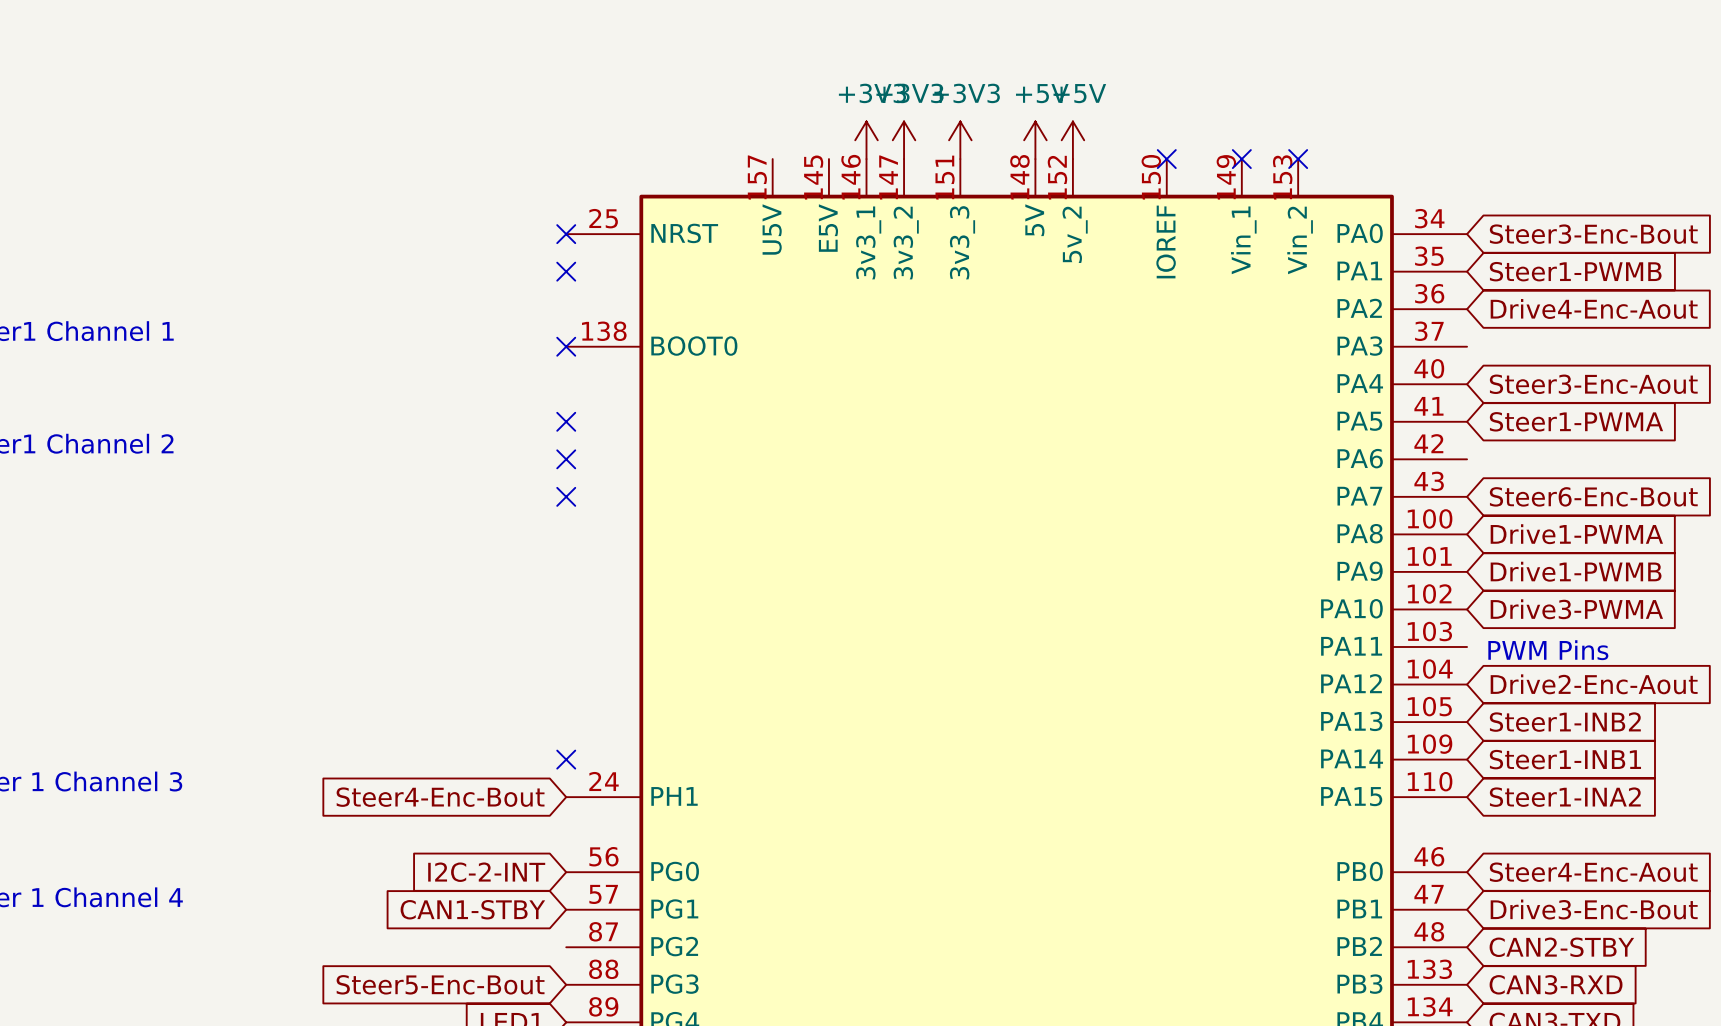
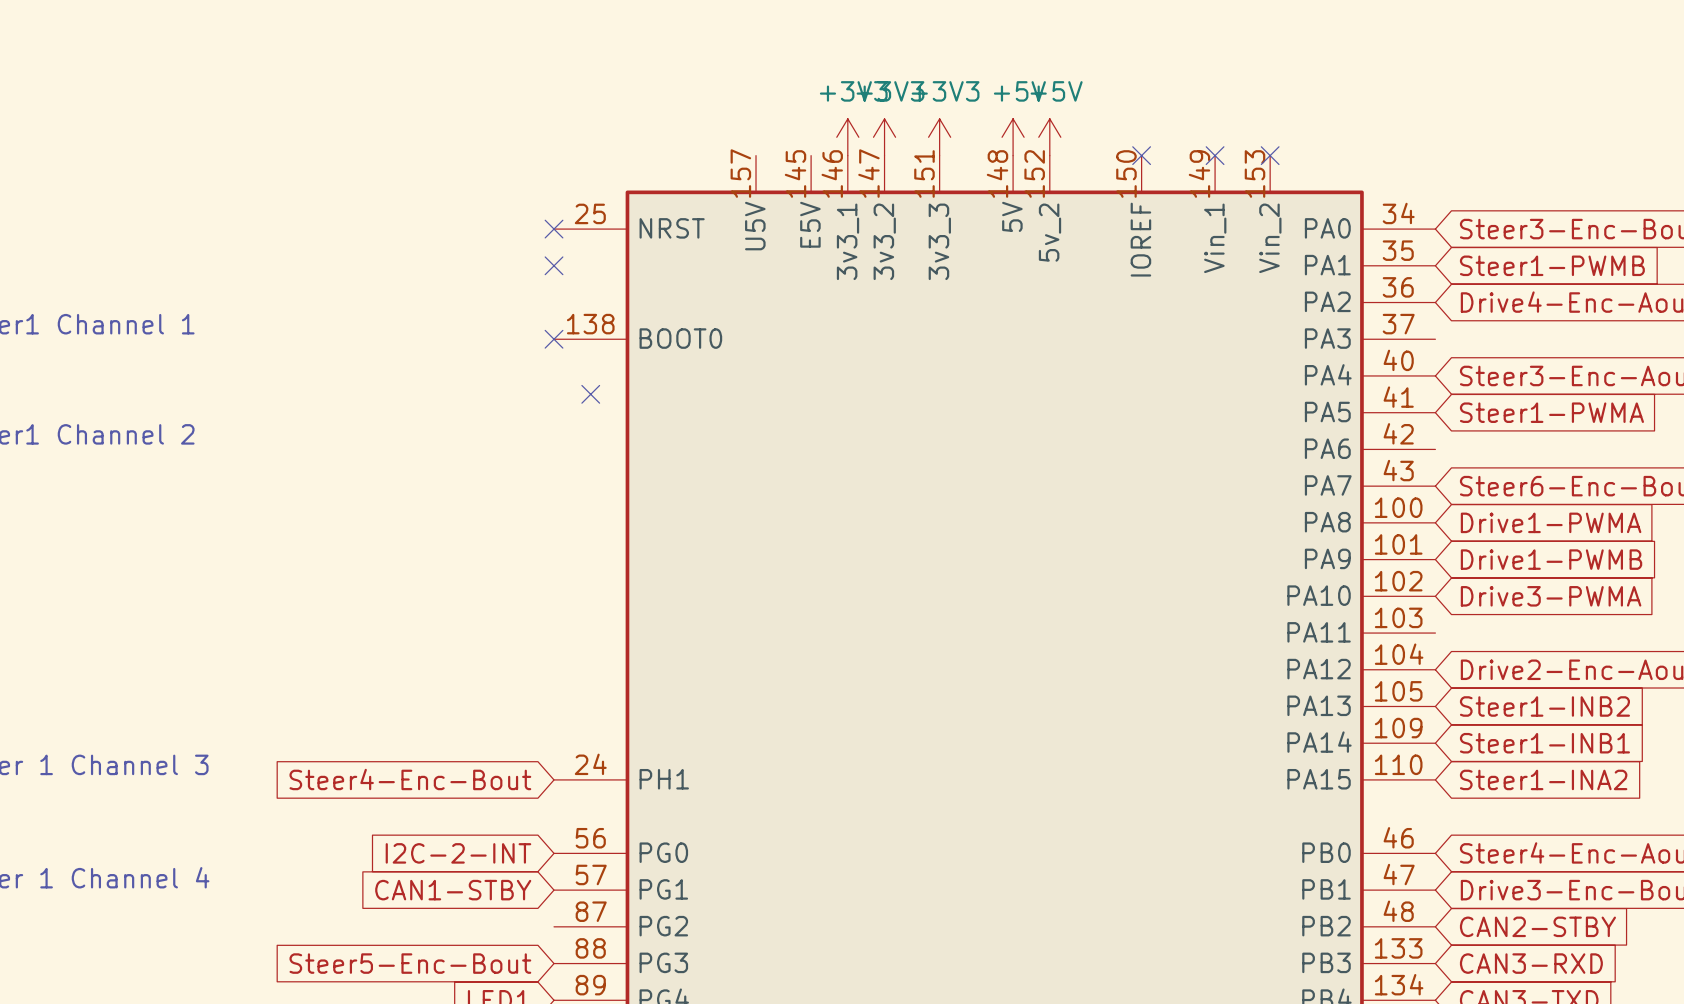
no-connect mark: none -> (590, 394)
no-connect mark: (566, 421) -> none
no-connect mark: (566, 459) -> none
no-connect mark: (566, 496) -> none
text: PWM Pins (1548, 650) -> none
no-connect mark: (566, 759) -> none

